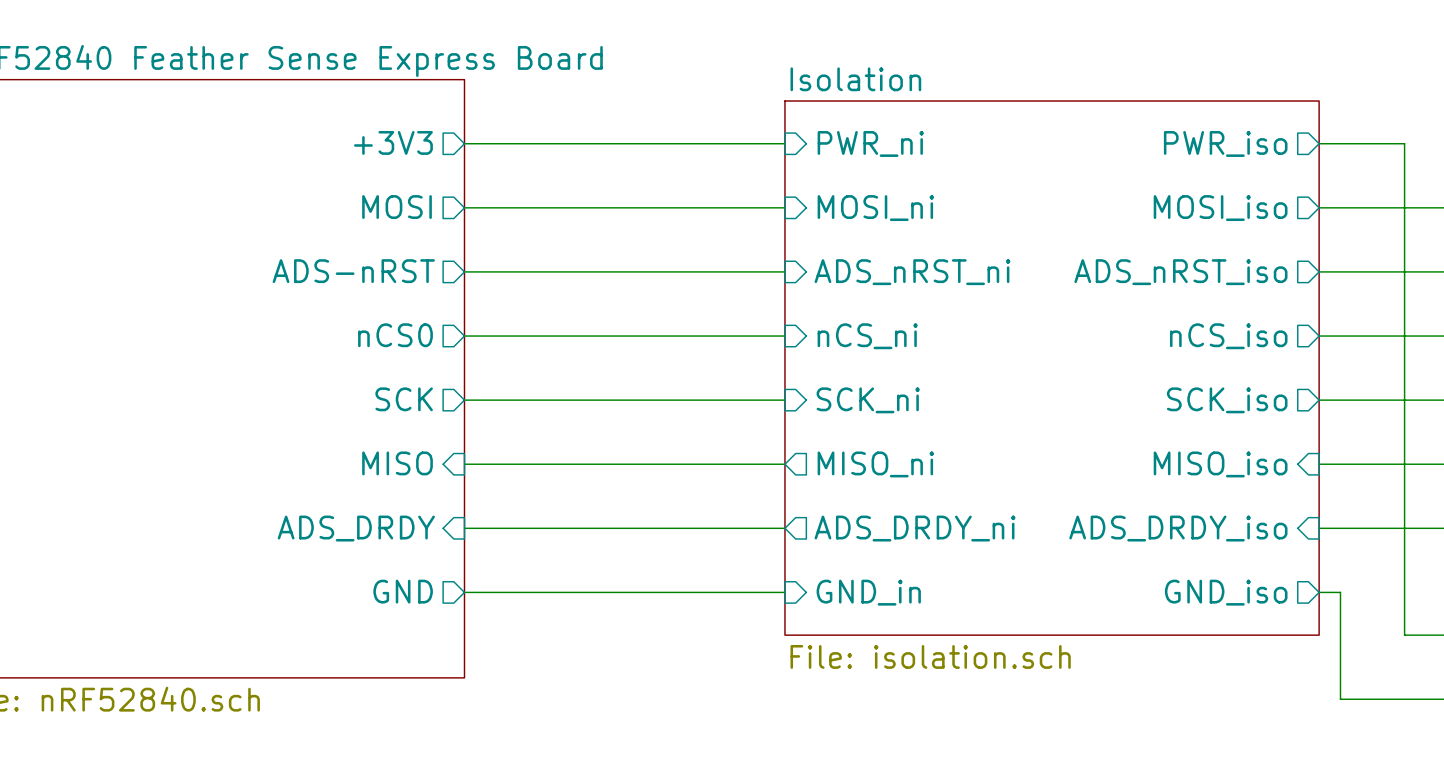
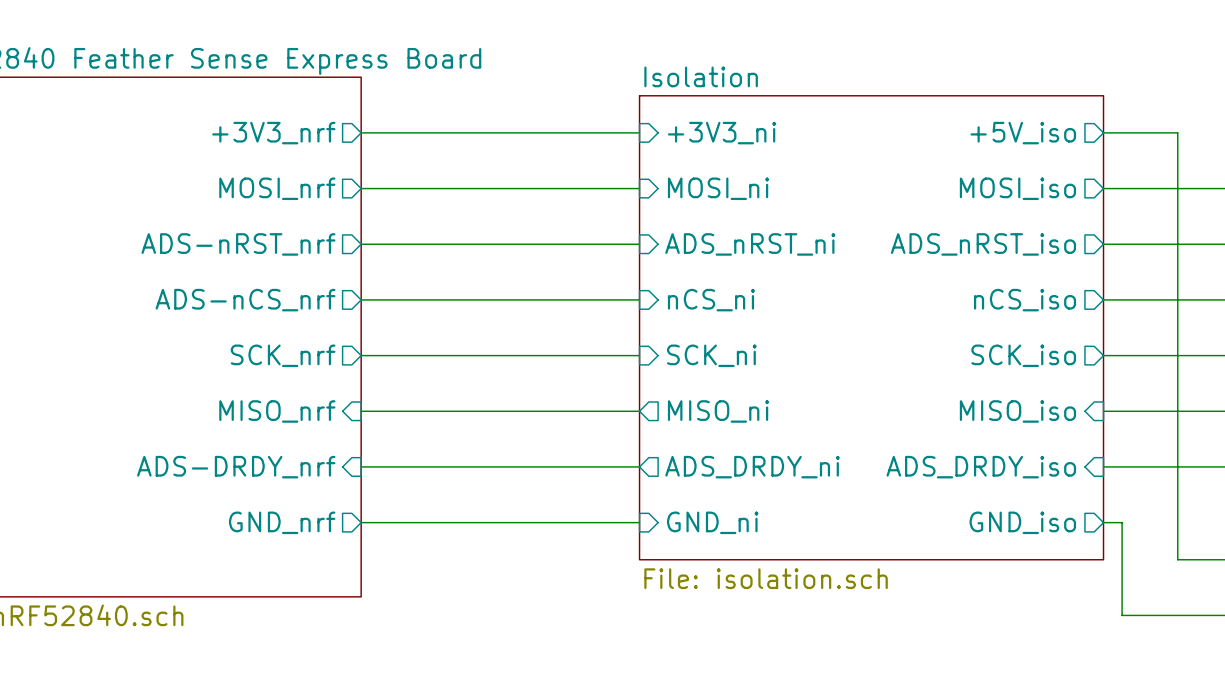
sheet pin: +3V3 (393, 142) -> +3V3_nrf (273, 133)
sheet pin: PWR_ni (870, 143) -> +3V3_ni (722, 133)
sheet pin: PWR_iso (1225, 143) -> +5V_iso (1023, 133)
sheet pin: MOSI (397, 207) -> MOSI_nrf (277, 188)
sheet pin: ADS-nRST (353, 271) -> ADS-nRST_nrf (238, 244)
sheet pin: nCS0 (395, 335) -> ADS-nCS_nrf (245, 300)
sheet pin: SCK (404, 399) -> SCK_nrf (283, 355)
sheet pin: MISO (397, 463) -> MISO_nrf (277, 411)
sheet pin: ADS_DRDY (356, 528) -> ADS-DRDY_nrf (236, 467)
sheet pin: GND (403, 591) -> GND_nrf (282, 522)
sheet pin: GND_in (868, 592) -> GND_ni (712, 522)

